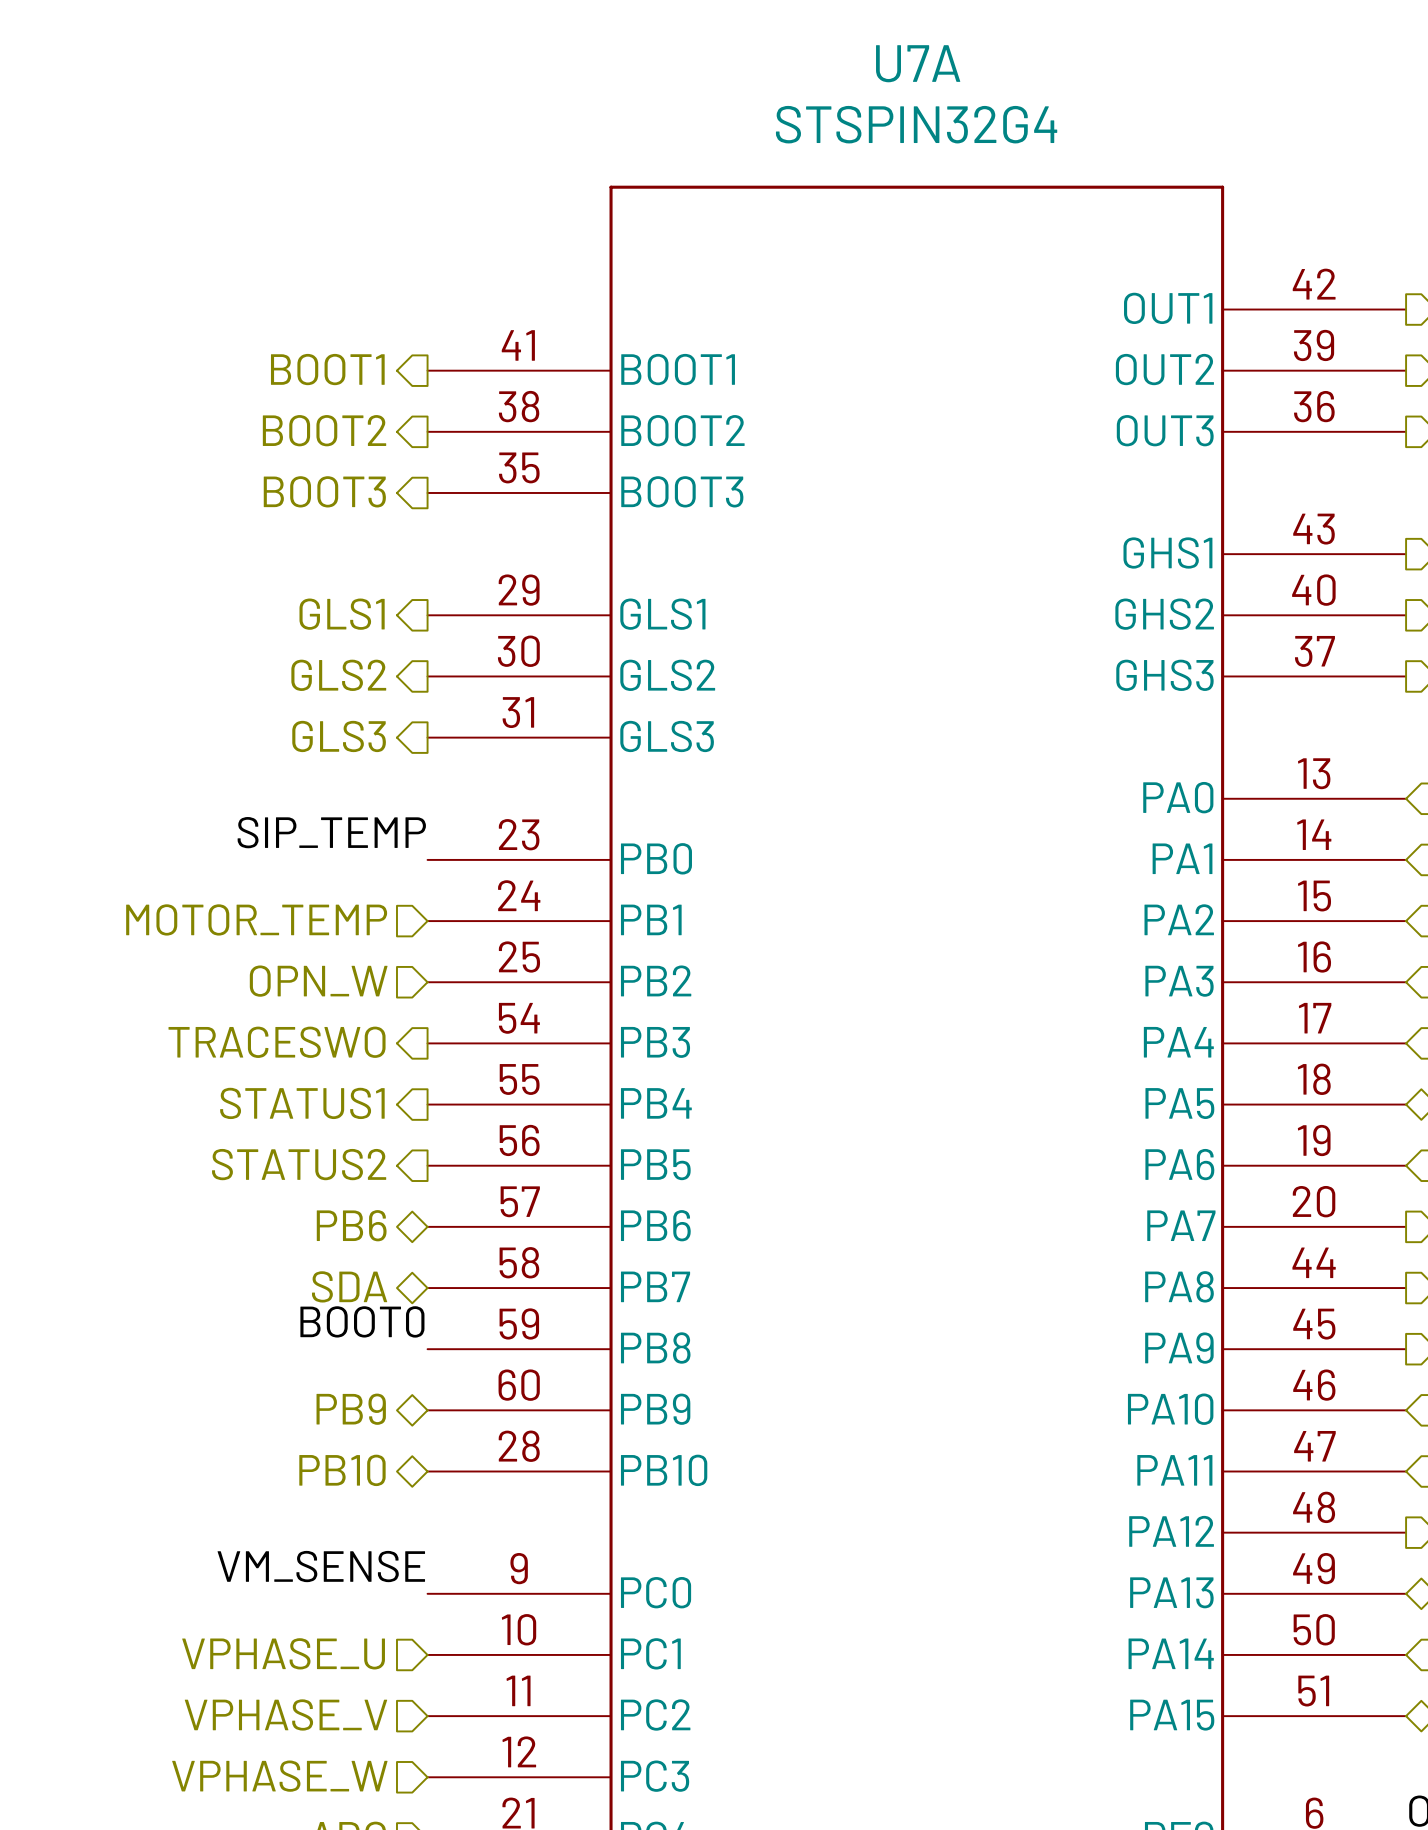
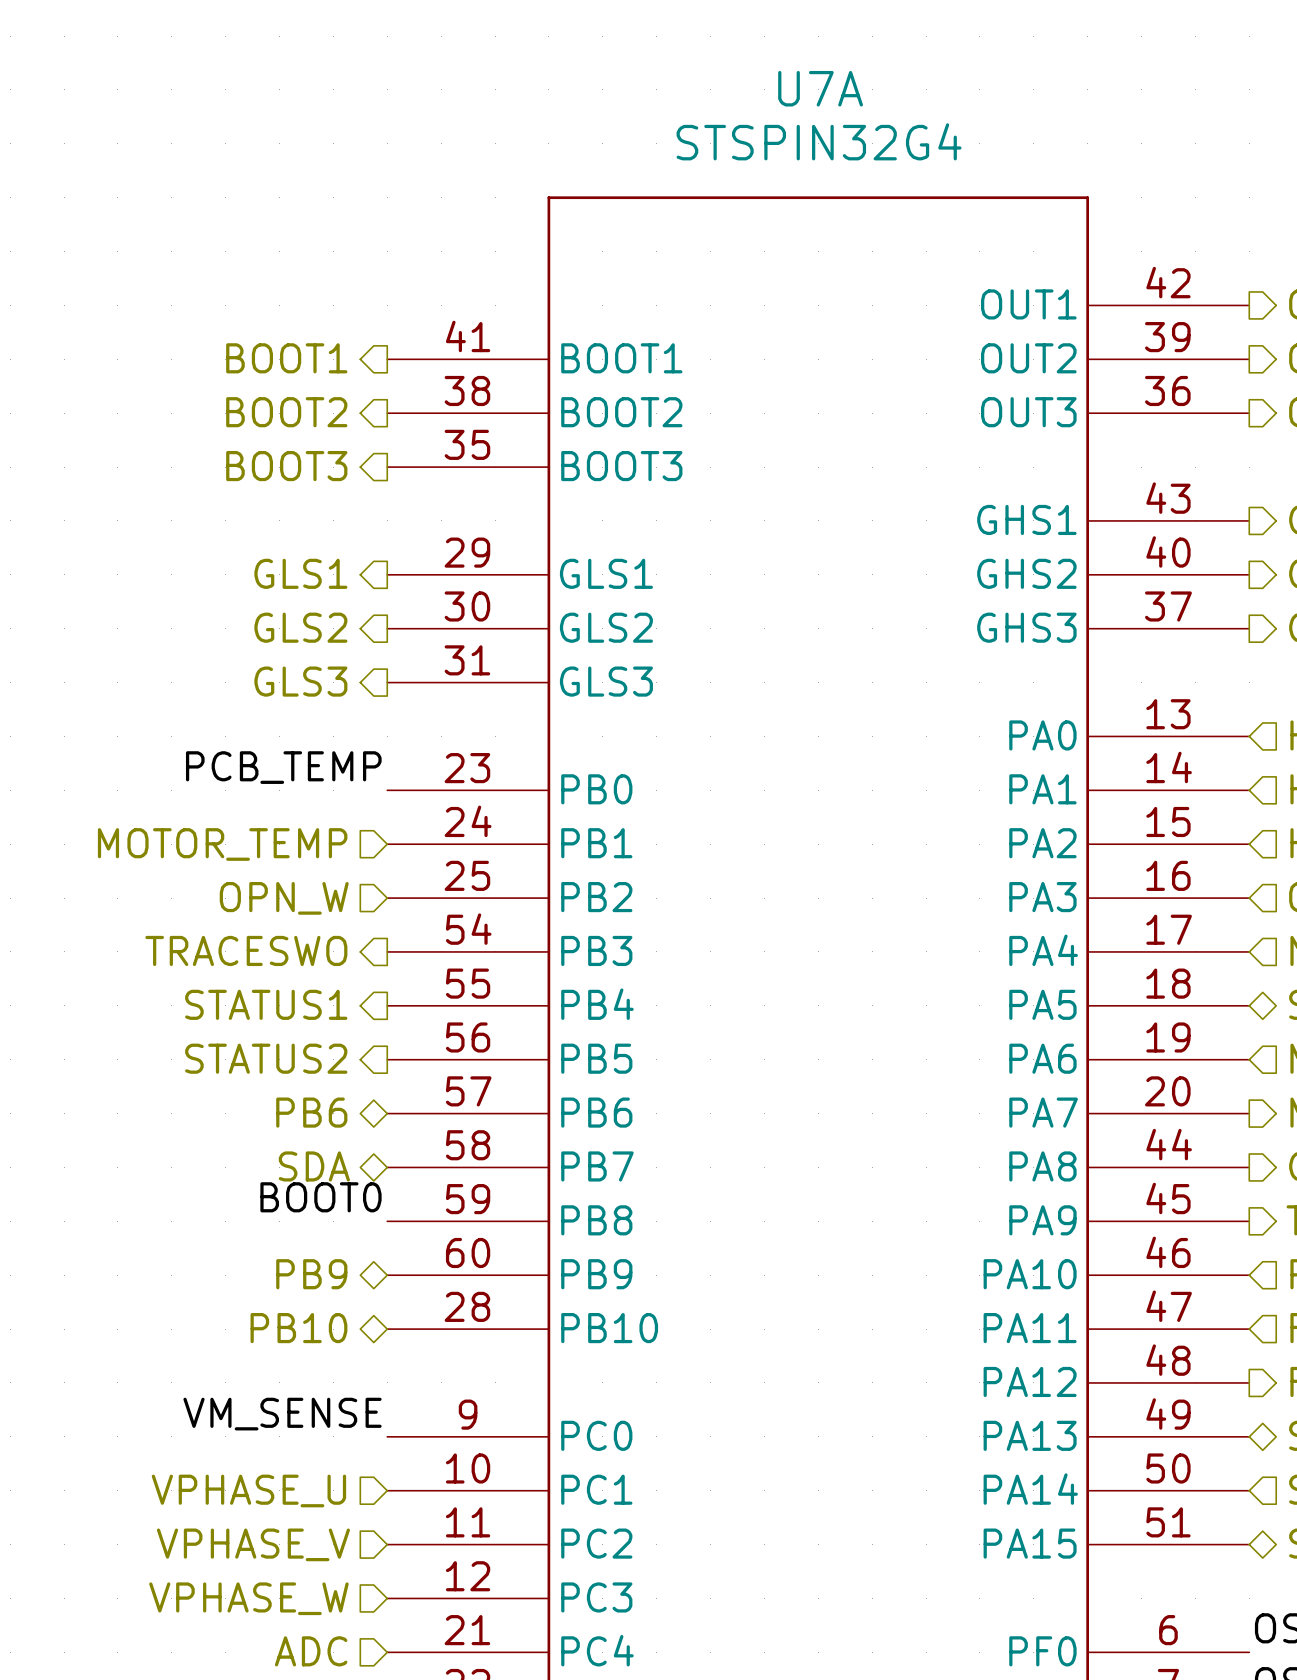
label: SIP_TEMP (331, 832) -> PCB_TEMP (283, 767)

